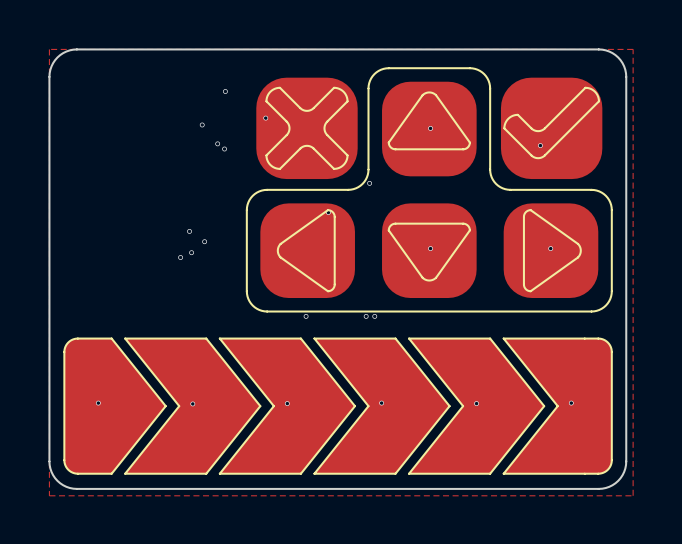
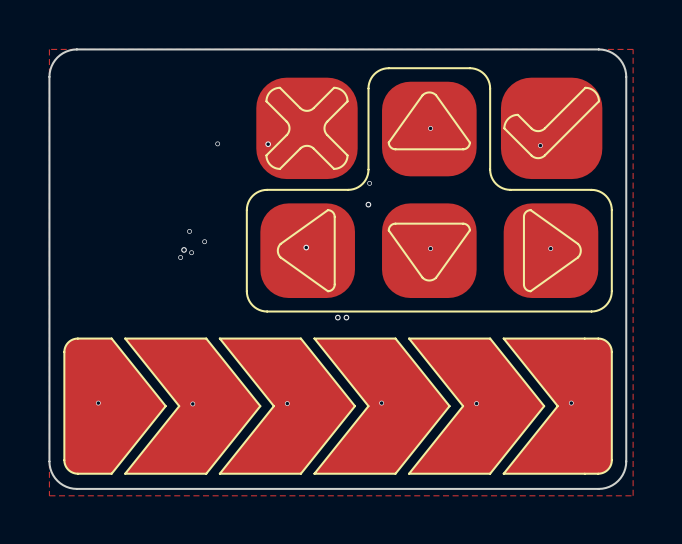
via: (225, 91) -> none
via: (265, 118) -> none
via: (202, 124) -> none
via: none -> (268, 144)
via: (224, 149) -> none
via: none -> (368, 204)
via: (328, 212) -> none
via: none -> (306, 247)
via: none -> (184, 249)
via: (306, 316) -> none
via: (366, 316) -> none
via: (374, 316) -> none
via: none -> (337, 317)
via: none -> (346, 317)

